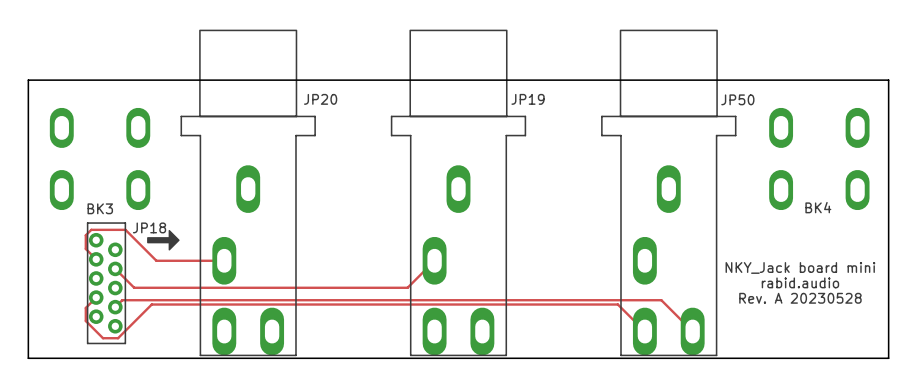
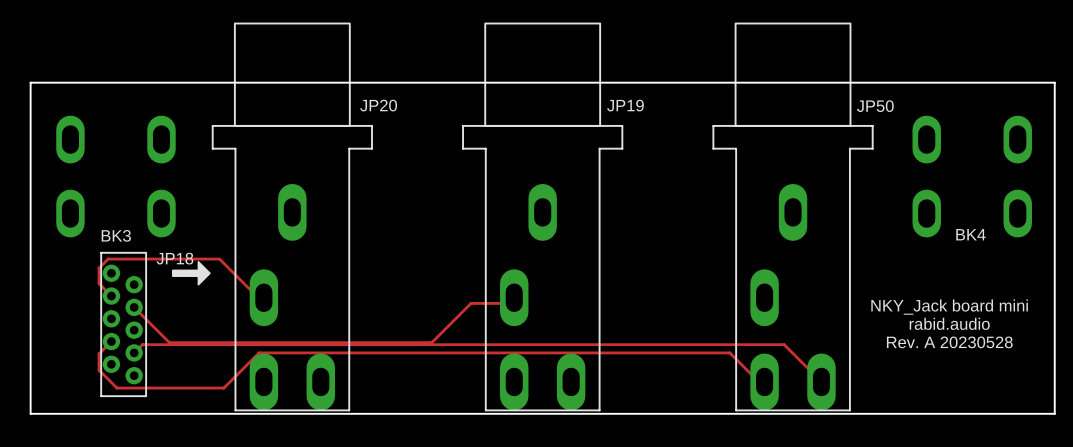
track: (85, 235) (91, 229) (125, 229) (156, 260) (224, 260) -> (99, 268) (108, 259) (219, 259) (263, 303)
track: (434, 260) (407, 287) (134, 287) -> (514, 303) (471, 303) (431, 342) (169, 342) (156, 329)
track: (85, 321) (103, 338) (118, 338) (151, 304) (617, 304) (644, 331) -> (99, 369) (116, 388) (223, 388) (259, 352) (729, 352) (764, 387)

